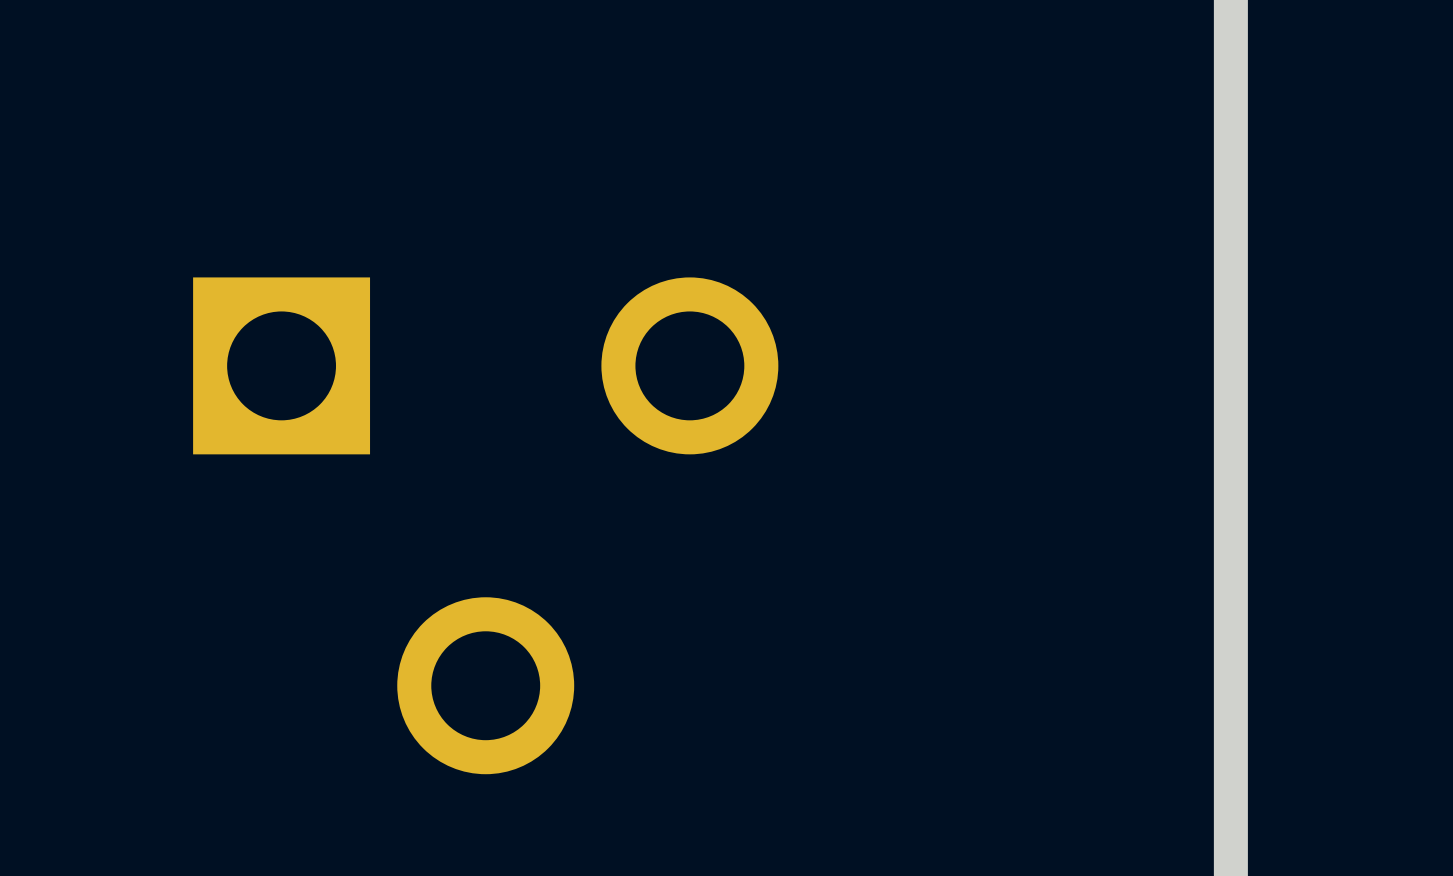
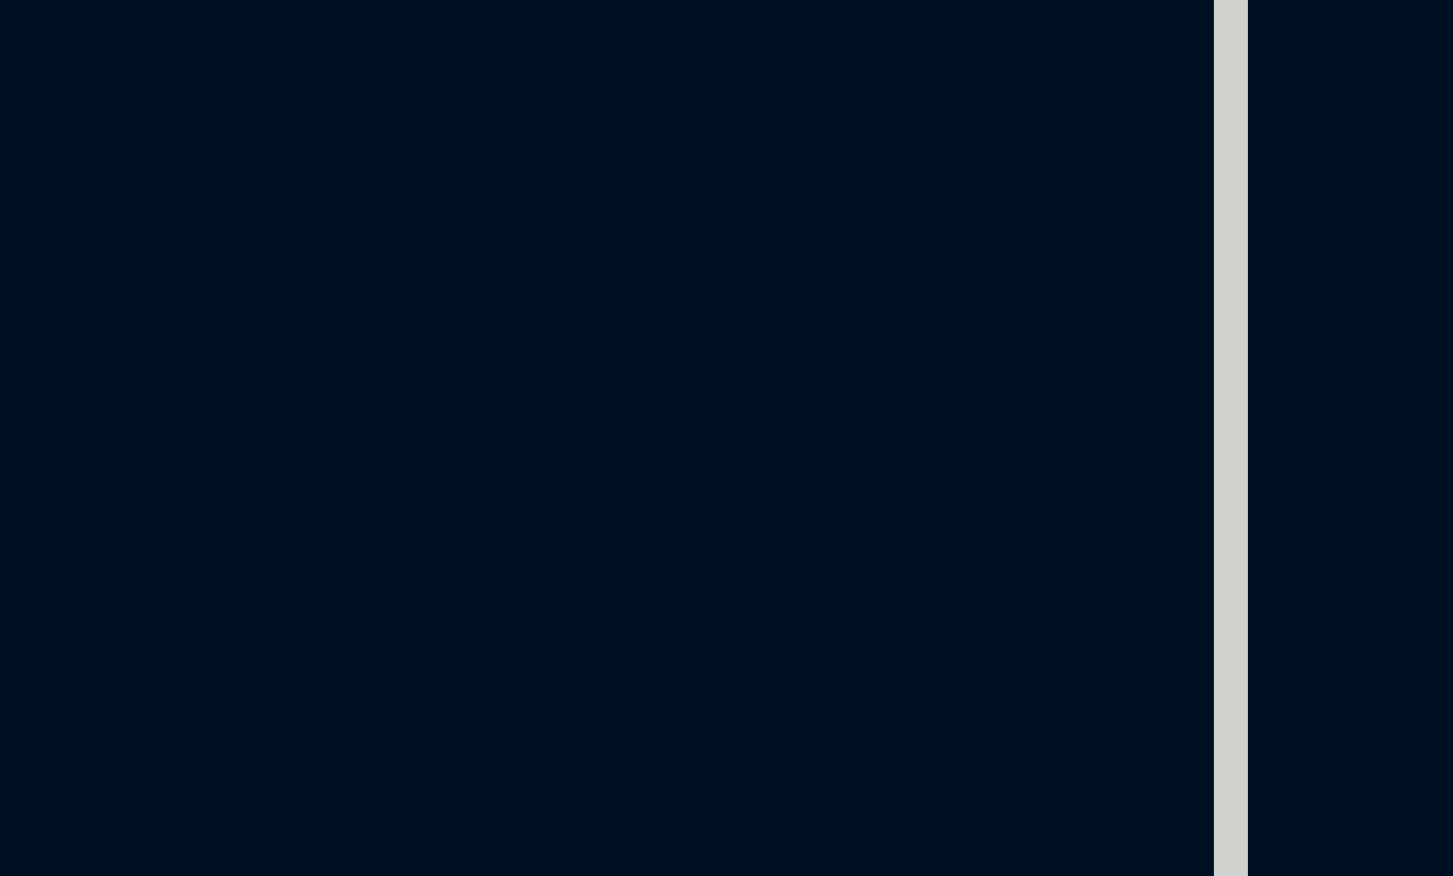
part: (485, 525) -> none

